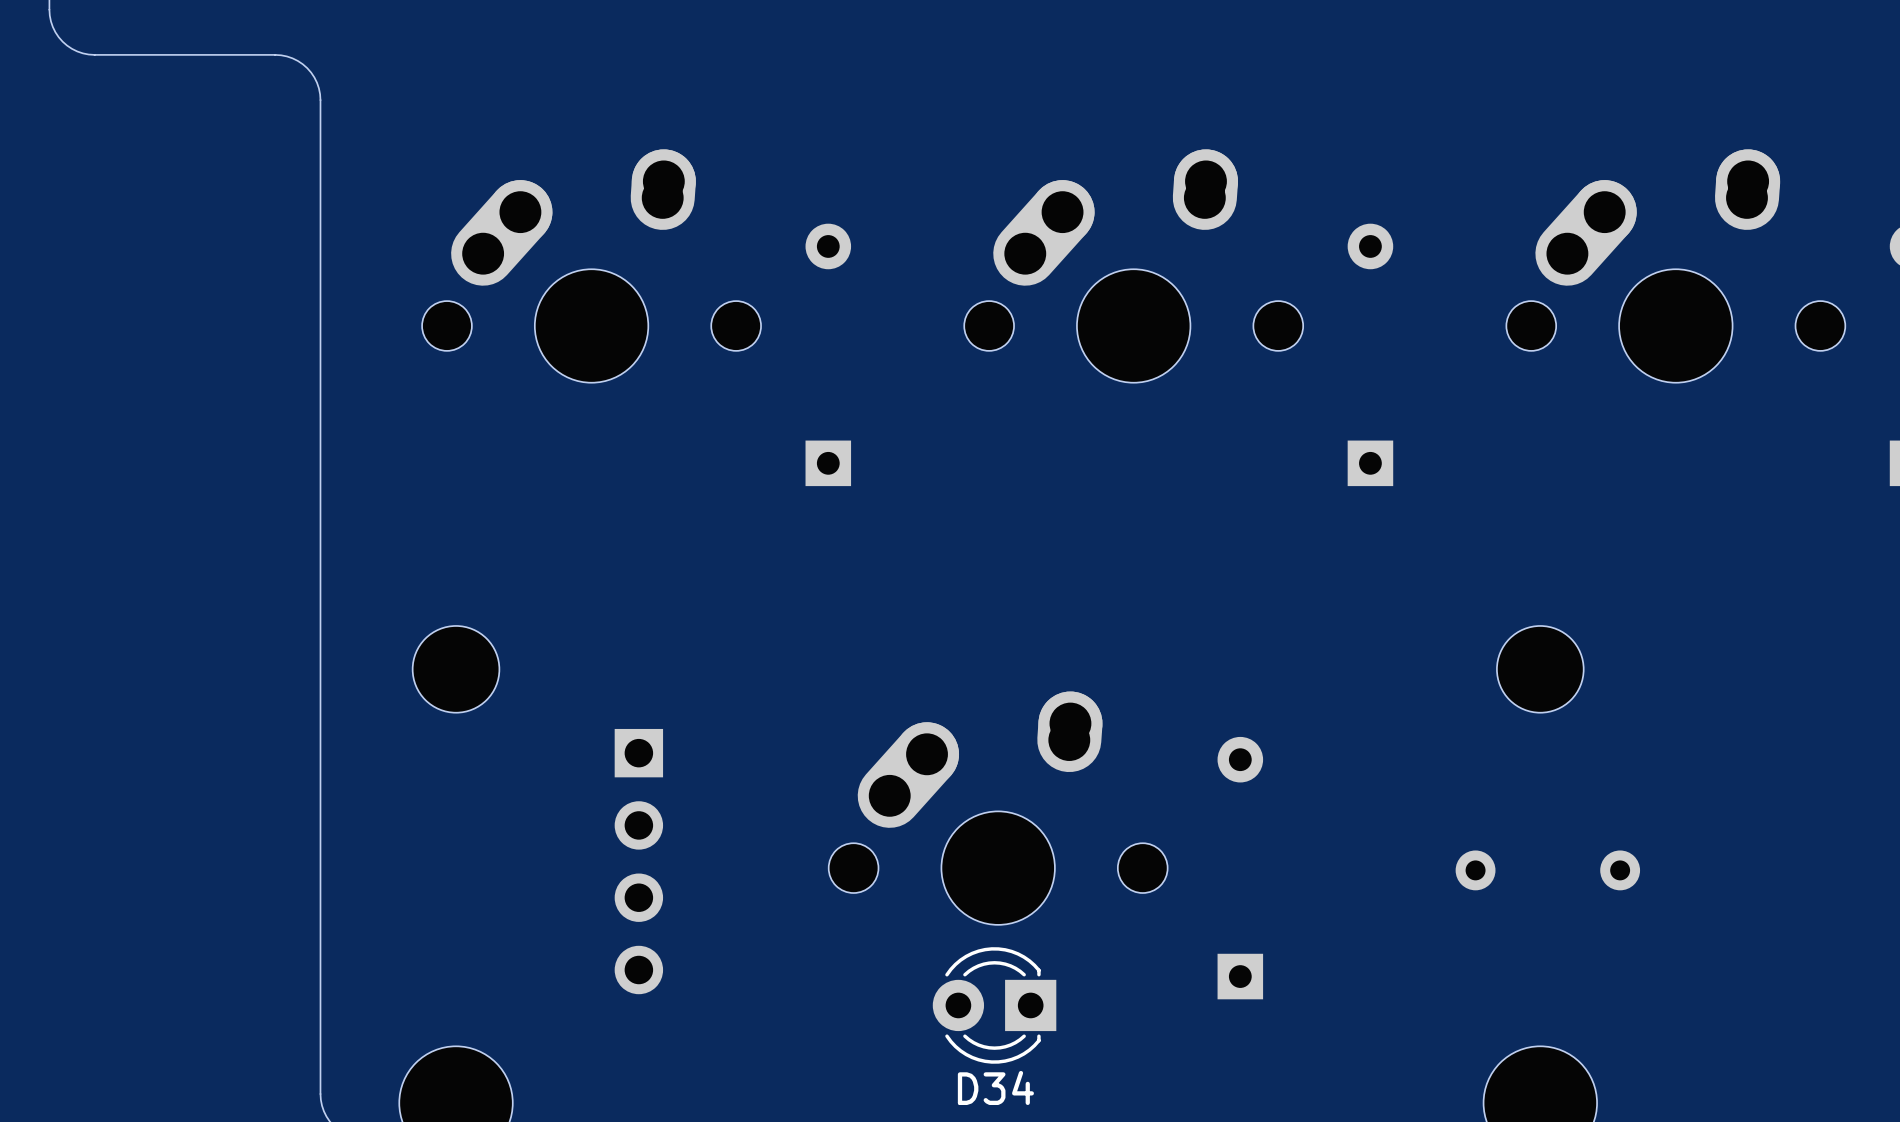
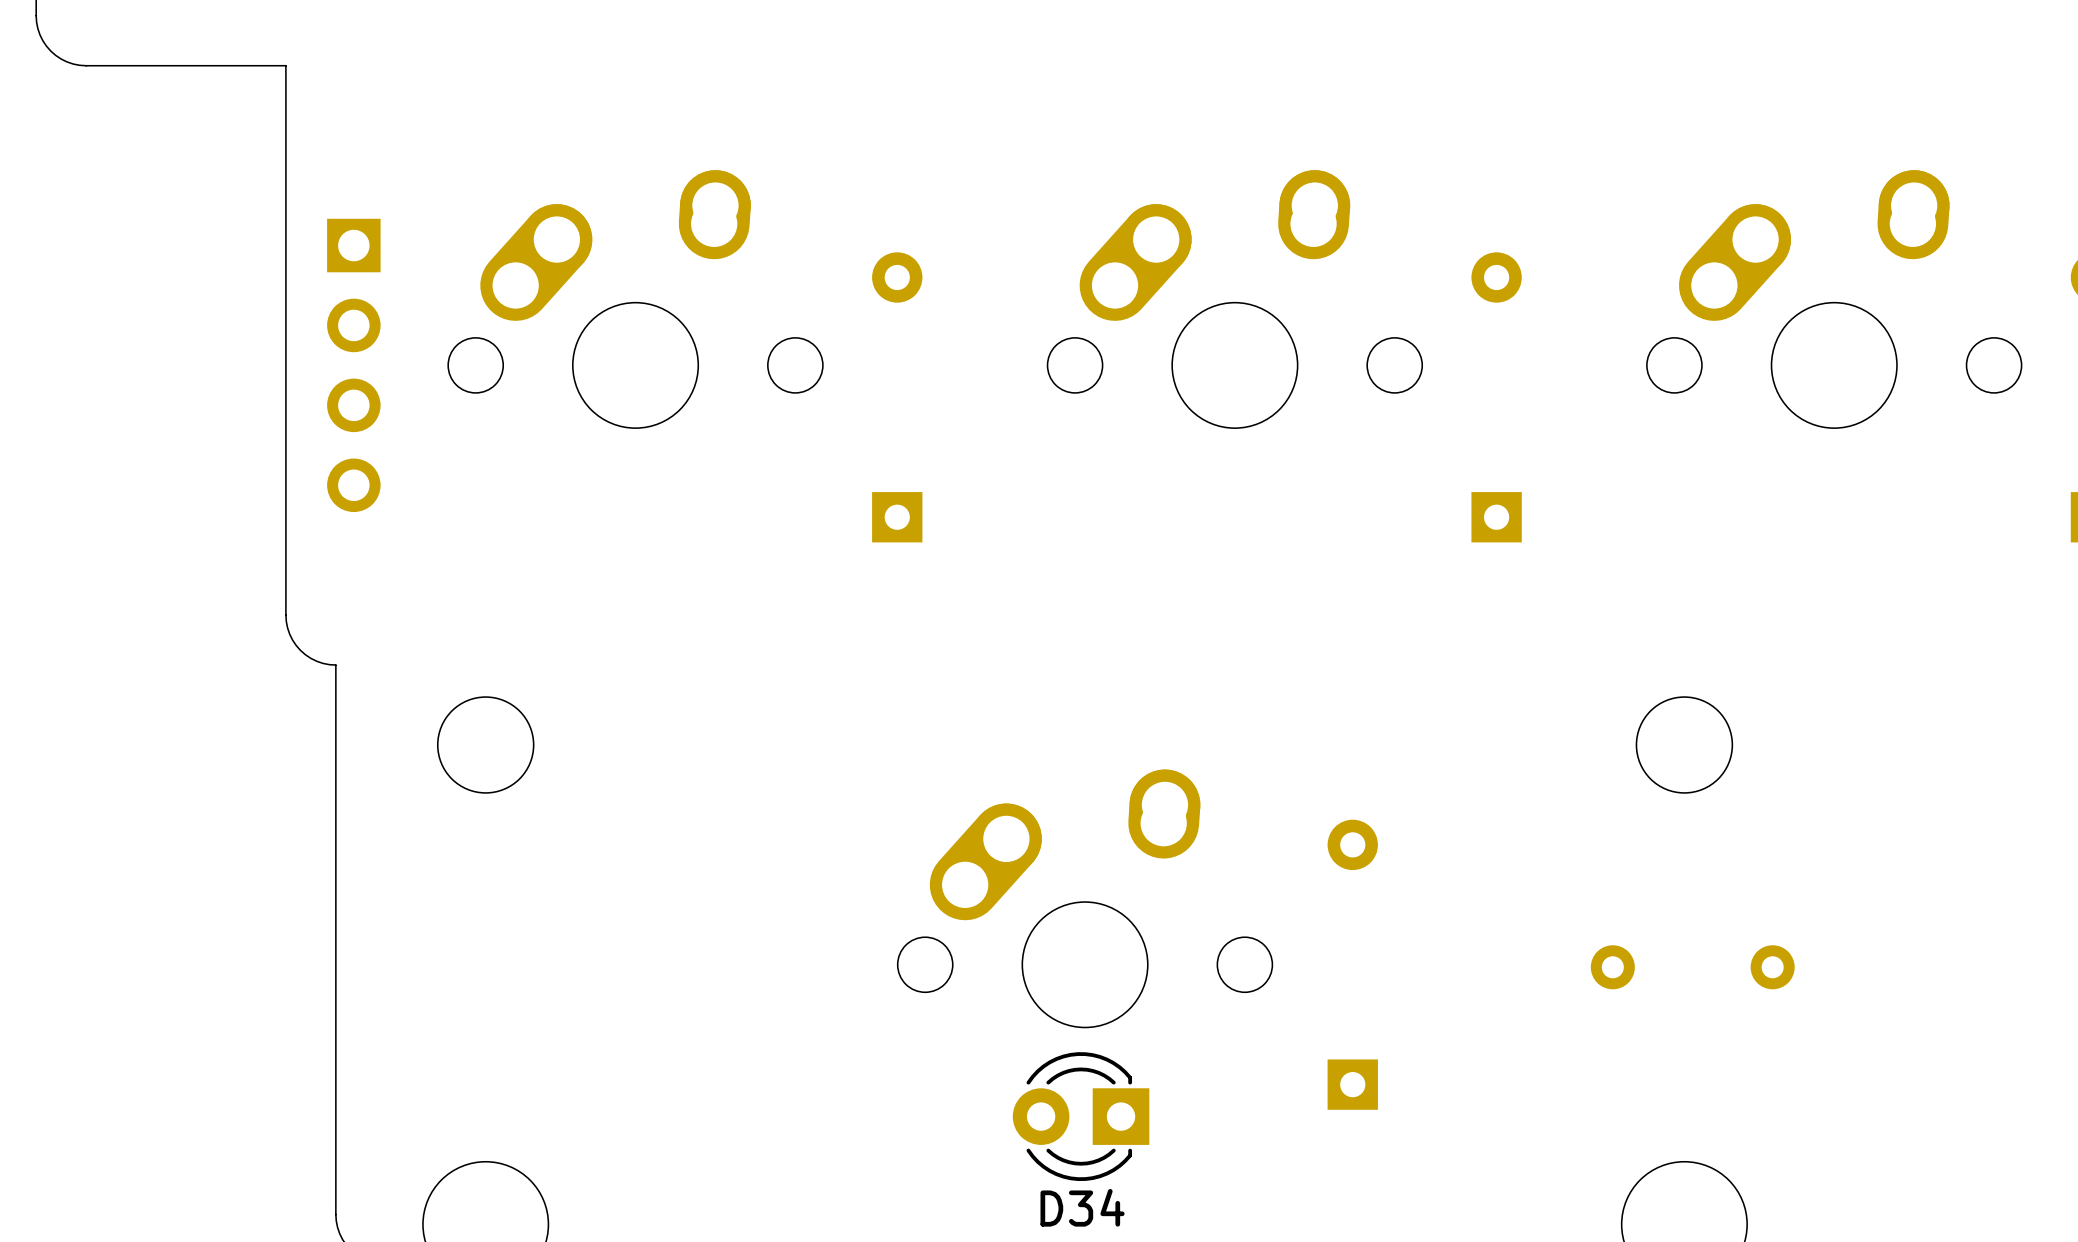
board edge: (275, 54) (292, 58) (307, 68) (317, 82) (320, 94) (320, 597) -> (285, 65) (286, 621) (289, 634) (300, 650) (316, 661) (335, 665)
part position: (638, 861) -> (353, 365)

